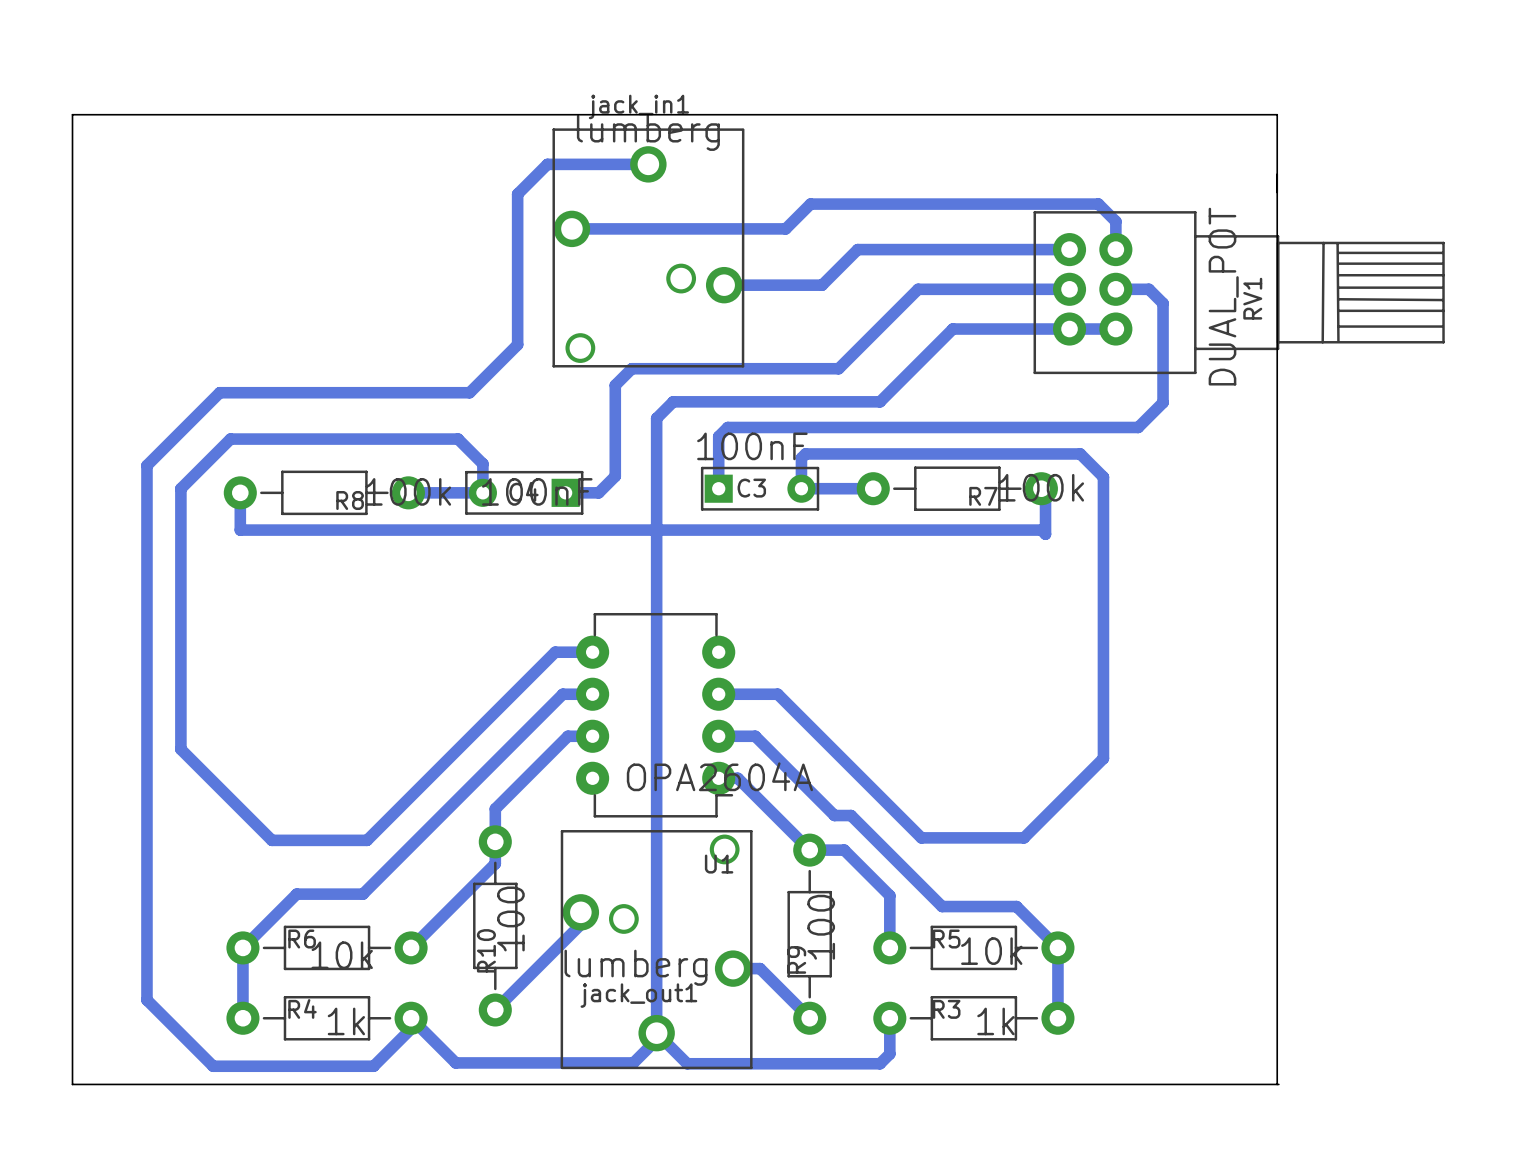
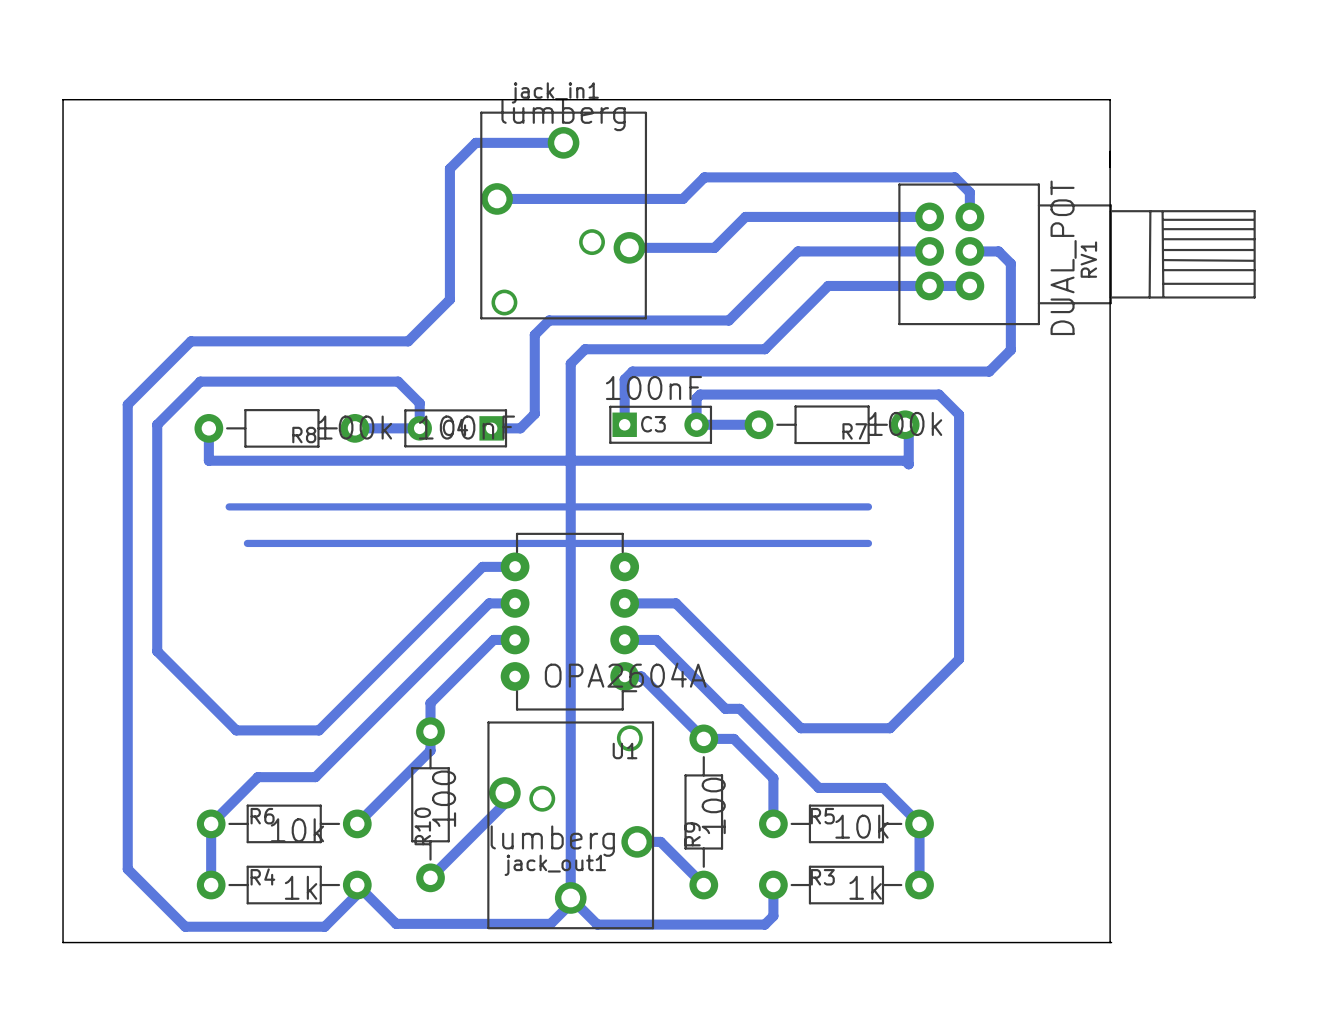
bottom track: none -> (229, 506) (868, 506)
bottom track: none -> (247, 543) (868, 543)

